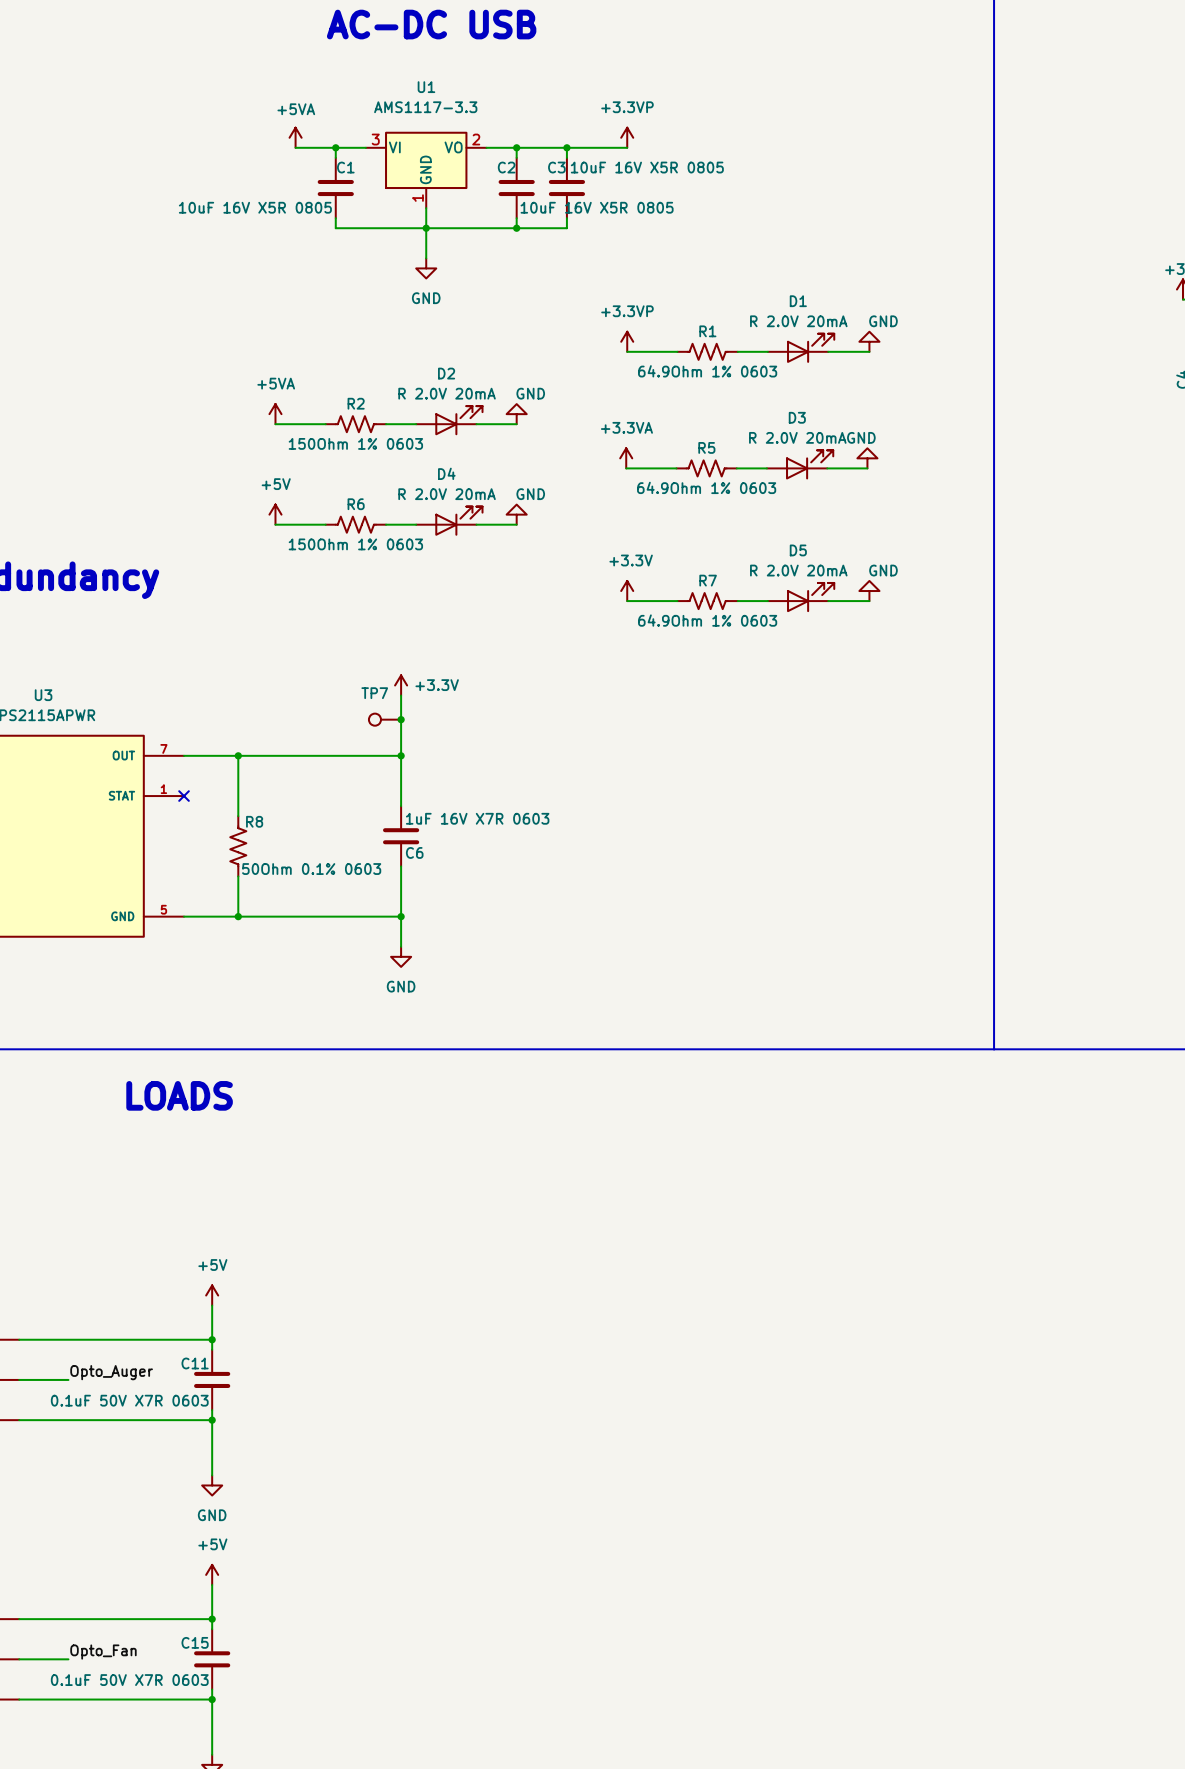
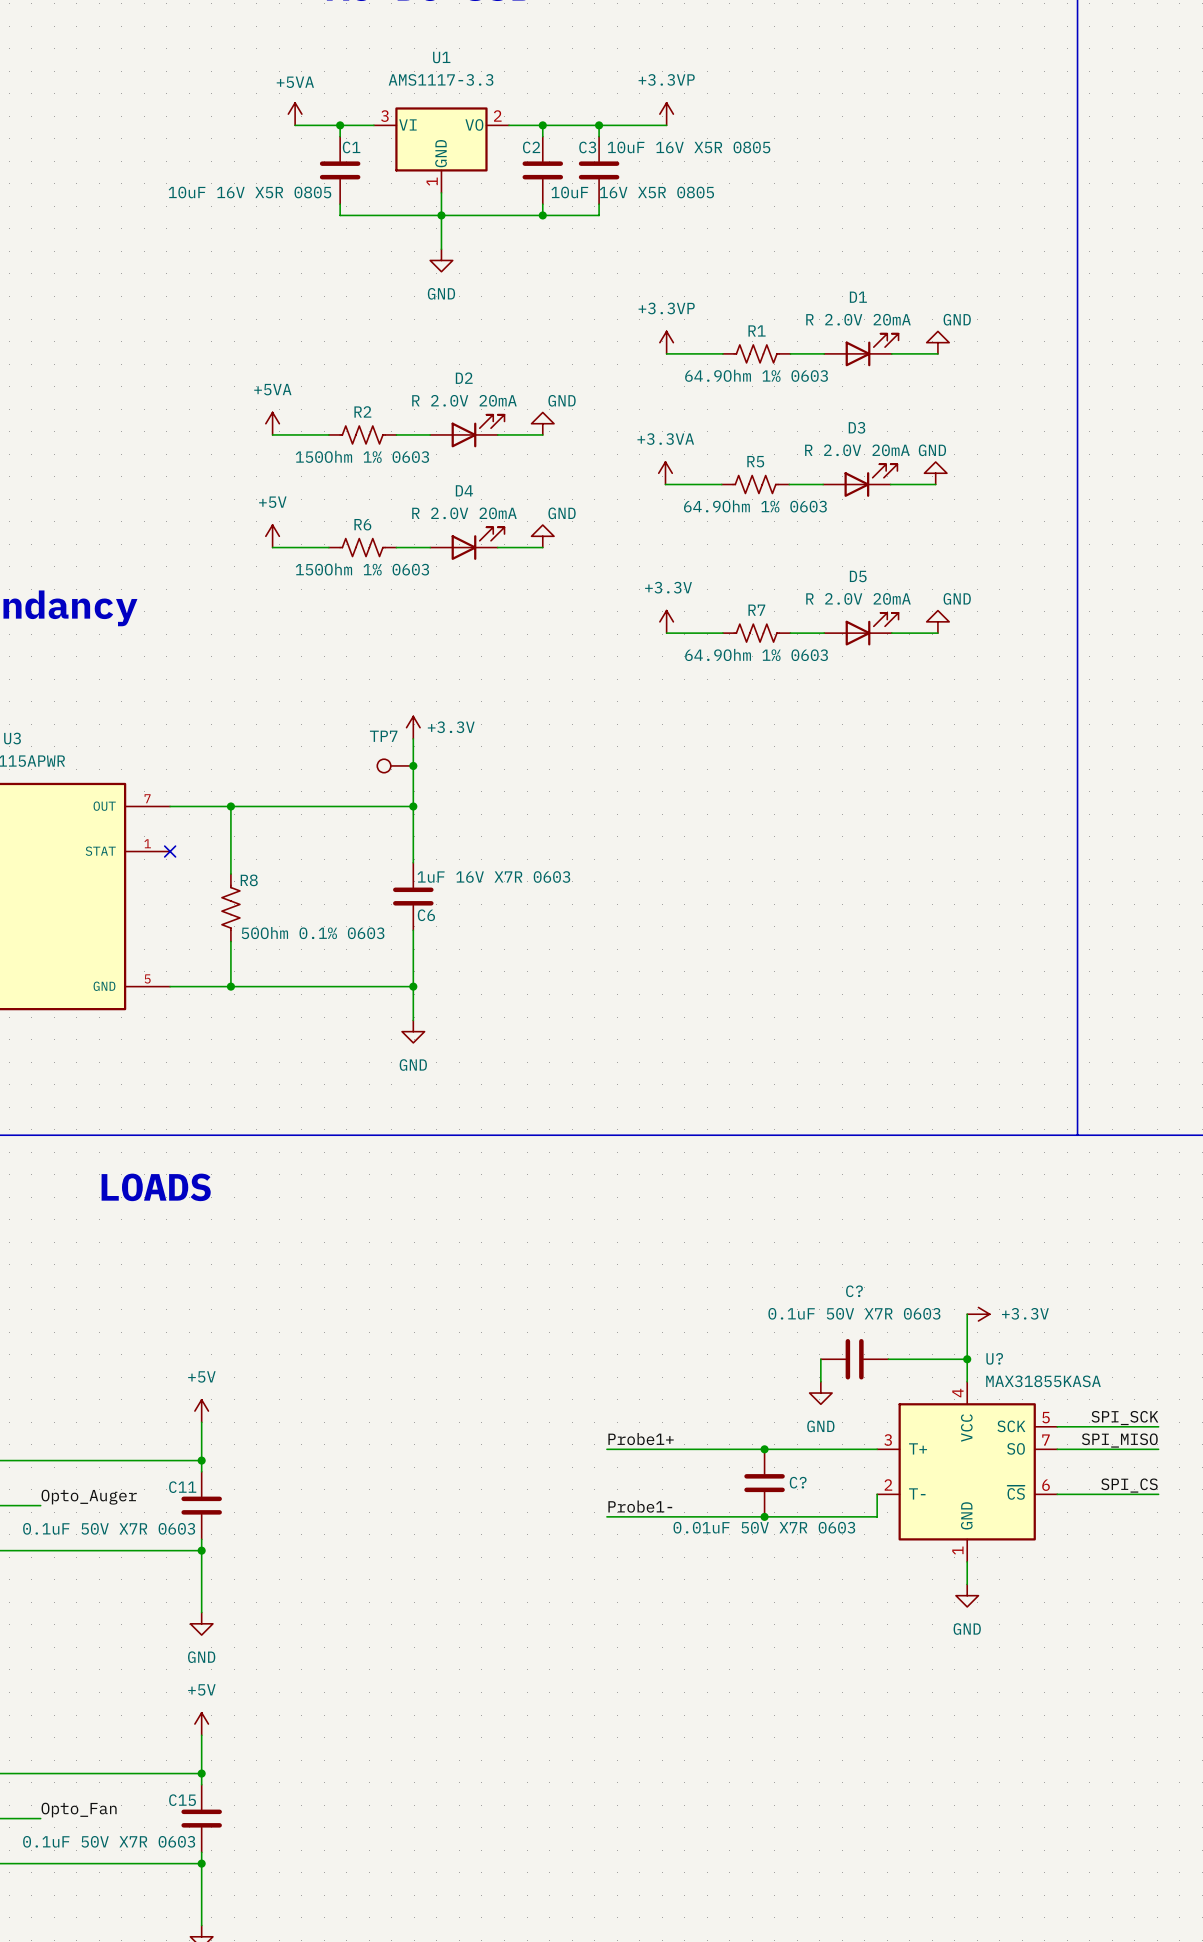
wire: none -> (967, 1314) (967, 1381)
power symbol: none -> +3.3V (978, 1314)
wire: none -> (820, 1359) (820, 1381)
C?: none -> 0.1uF 50V X7R 0603 (854, 1359)
wire: none -> (888, 1359) (967, 1359)
junction: none -> (967, 1359)
power symbol: none -> GND (820, 1393)
label: none -> SPI_SCK (1124, 1418)
wire: none -> (1057, 1426) (1158, 1426)
label: none -> Probe1+ (641, 1439)
label: none -> SPI_MISO (1119, 1440)
wire: none -> (606, 1449) (877, 1449)
junction: none -> (764, 1449)
wire: none -> (1057, 1449) (1158, 1449)
U?: none -> MAX31855KASA (967, 1471)
C?: none -> 0.01uF 50V X7R 0603 (764, 1483)
label: none -> SPI_CS (1129, 1485)
wire: none -> (877, 1494) (877, 1516) (606, 1516)
wire: none -> (1057, 1494) (1158, 1494)
label: none -> Probe1- (640, 1506)
junction: none -> (764, 1516)
wire: none -> (967, 1561) (967, 1584)
power symbol: none -> GND (967, 1595)

